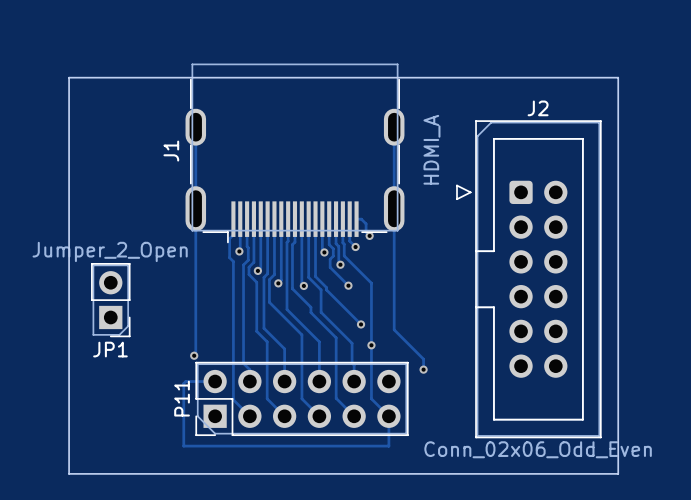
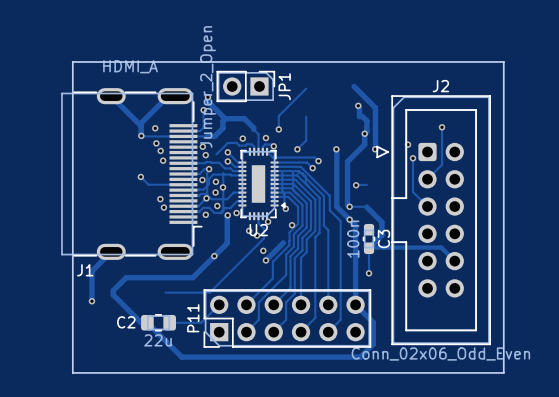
track: none -> (354, 86) (375, 107) (375, 149)
track: none -> (306, 88) (278, 116) (278, 129)
track: none -> (111, 96) (141, 126)
track: none -> (175, 96) (168, 96) (141, 123) (141, 136) (214, 136) (222, 128) (222, 120) (225, 118)
track: none -> (207, 97) (207, 101) (225, 118)
via: none -> (207, 97)
track: (195, 127) (195, 354) (194, 355) -> none
track: (394, 127) (394, 329) (423, 359) (423, 369) -> none
track: none -> (358, 105) (359, 116) (362, 116) (366, 120) (366, 131) (364, 133) (364, 144) (347, 161) (347, 204) (349, 206) (366, 206) (381, 222) (381, 235) (369, 248)
via: none -> (358, 105)
track: none -> (203, 110) (203, 127) (200, 131) (183, 131)
via: none -> (203, 110)
track: none -> (306, 116) (306, 140) (297, 149)
track: none -> (225, 118) (244, 118) (258, 134) (258, 151)
J1 name position: J1 (171, 151) -> J1 (85, 270)
J1 rotation: 0° (294, 153) -> 90° counterclockwise (131, 174)
J1 position: (294, 153) -> (131, 174)
track: none -> (442, 127) (442, 164) (427, 179)
via: none -> (442, 127)
via: none -> (155, 128)
via: none -> (278, 129)
via: none -> (364, 133)
via: none -> (141, 135)
via: none -> (265, 138)
via: none -> (242, 138)
via: none -> (156, 143)
via: none -> (407, 144)
via: none -> (202, 146)
track: none -> (273, 146) (264, 144) (262, 151)
via: none -> (273, 146)
via: none -> (297, 149)
track: none -> (336, 149) (336, 206) (355, 225) (355, 304) (373, 322) (373, 344) (360, 357) (181, 357) (147, 322) (141, 322) (113, 295) (113, 290) (126, 277) (192, 277) (227, 243) (227, 215)
via: none -> (336, 149)
via: none -> (375, 149)
via: none -> (160, 150)
track: none -> (227, 152) (237, 162) (242, 162)
via: none -> (227, 152)
track: none -> (254, 151) (254, 146) (251, 144) (239, 145) (236, 143) (227, 143) (216, 154)
track: none -> (267, 151) (272, 157) (314, 157) (318, 161)
via: none -> (205, 155)
track: none -> (412, 158) (412, 192) (427, 206)
via: none -> (412, 158)
via: none -> (163, 160)
track: none -> (227, 161) (234, 166) (242, 166)
via: none -> (227, 161)
via: none -> (318, 161)
track: none -> (274, 162) (307, 162) (312, 168)
track: none -> (183, 163) (219, 162) (224, 168) (242, 171)
track: none -> (274, 166) (300, 166) (329, 195) (329, 210) (340, 221) (340, 319) (328, 332)
via: none -> (312, 168)
track: none -> (209, 169) (204, 169) (199, 174) (183, 174)
via: none -> (209, 169)
track: none -> (274, 171) (298, 171) (323, 196) (323, 225) (328, 230) (328, 304)
track: (233, 219) (233, 234) (229, 238) (229, 257) (233, 261) (233, 399) (249, 416) -> none
track: (247, 219) (248, 260) (243, 264) (243, 363) (249, 369) (249, 381) -> none
track: (253, 219) (253, 262) (249, 267) (249, 274) (256, 282) (256, 331) (267, 341) (267, 398) (284, 416) -> none
track: (267, 219) (267, 273) (263, 277) (263, 328) (284, 348) (284, 381) -> none
track: (274, 219) (274, 274) (269, 279) (269, 302) (301, 334) (301, 398) (319, 416) -> none
track: (281, 219) (281, 280) (278, 283) -> none
track: (288, 219) (287, 309) (319, 341) (319, 381) -> none
track: (294, 219) (294, 242) (292, 244) (292, 288) (310, 307) (310, 312) (336, 337) (336, 398) (354, 416) -> none
track: (301, 219) (301, 283) (303, 285) -> none
track: (308, 219) (308, 277) (321, 289) (321, 312) (352, 343) (354, 381) -> none
track: (315, 219) (315, 276) (361, 324) -> none
track: (329, 219) (329, 244) (333, 248) (330, 267) (348, 285) -> none
track: (342, 219) (344, 255) (371, 283) (371, 398) (388, 416) (388, 446) (183, 446) (183, 383) (185, 381) (215, 381) -> none
track: none -> (242, 175) (213, 174) (208, 178) (208, 184) (203, 189) (183, 190)
track: none -> (274, 175) (297, 175) (319, 197) (319, 232) (315, 237) (315, 317) (301, 332)
track: none -> (140, 176) (148, 184) (183, 184)
via: none -> (140, 176)
track: none -> (274, 179) (295, 179) (315, 199) (315, 231) (306, 239) (306, 252) (301, 257) (301, 304)
via: none -> (202, 180)
via: none -> (215, 181)
U2: none -> (262, 184)
track: none -> (274, 184) (293, 184) (311, 201) (311, 229) (302, 237) (302, 250) (294, 258) (294, 293) (286, 302) (286, 319) (273, 332)
via: none -> (356, 185)
track: none -> (366, 184) (356, 185)
via: (369, 235) -> none
via: none -> (222, 187)
track: none -> (274, 188) (291, 188) (306, 203) (306, 227) (298, 236) (298, 248) (290, 256) (290, 288) (273, 304)
via: none -> (215, 192)
track: none -> (242, 192) (233, 192) (227, 199) (211, 199) (206, 193) (183, 195)
track: none -> (274, 192) (290, 192) (302, 204) (302, 225) (293, 234) (293, 246) (286, 254) (286, 275) (258, 302) (258, 319) (246, 332)
via: (355, 246) -> none
track: none -> (274, 196) (288, 196) (298, 206) (298, 223) (289, 232) (289, 245) (272, 261) (272, 278) (246, 304)
via: none -> (160, 199)
via: (324, 252) -> none
track: none -> (203, 200) (198, 206) (183, 206)
track: none -> (242, 201) (237, 201) (230, 208) (225, 208) (220, 212) (214, 212) (209, 207) (203, 207) (199, 211) (183, 211)
via: none -> (217, 205)
via: none -> (349, 206)
via: none -> (163, 207)
via: (257, 270) -> none
via: none -> (236, 213)
via: none -> (205, 214)
via: none -> (227, 215)
track: none -> (258, 216) (258, 223) (264, 228) (264, 238) (209, 292) (165, 292)
via: none -> (349, 219)
via: none -> (268, 221)
via: (278, 283) -> none
via: (303, 285) -> none
via: none -> (249, 230)
via: none -> (257, 235)
JP1 rotation: 0° (110, 300) -> 90° counterclockwise (245, 86)
JP1 position: (110, 300) -> (245, 86)
C3: none -> 100n (369, 238)
track: none -> (283, 242) (265, 260)
track: none -> (369, 248) (369, 273)
track: none -> (369, 248) (441, 247) (454, 261)
via: none -> (263, 250)
track: none -> (111, 251) (91, 271) (91, 301)
via: (361, 324) -> none
via: none -> (214, 256)
via: none -> (265, 260)
via: (371, 345) -> none
via: (194, 355) -> none
via position: (423, 369) -> (369, 273)
via: none -> (91, 301)
track: none -> (219, 304) (201, 322) (169, 322)
P11 position: (302, 398) -> (287, 318)
C2: none -> 22u (158, 322)

